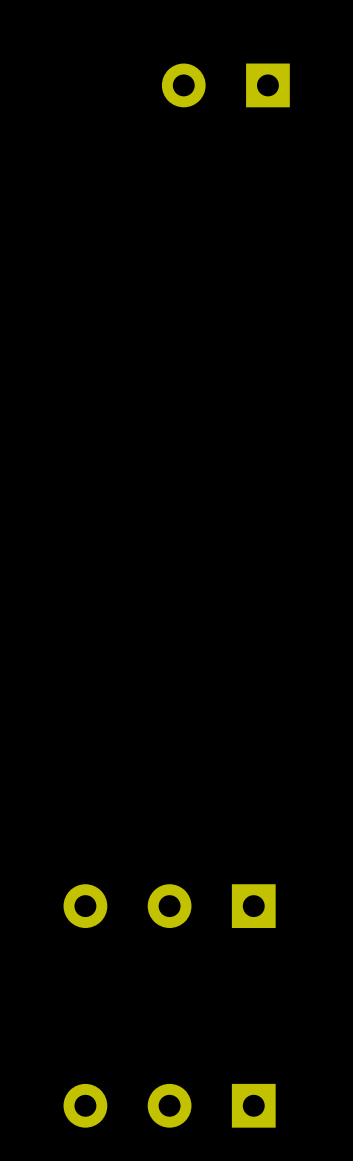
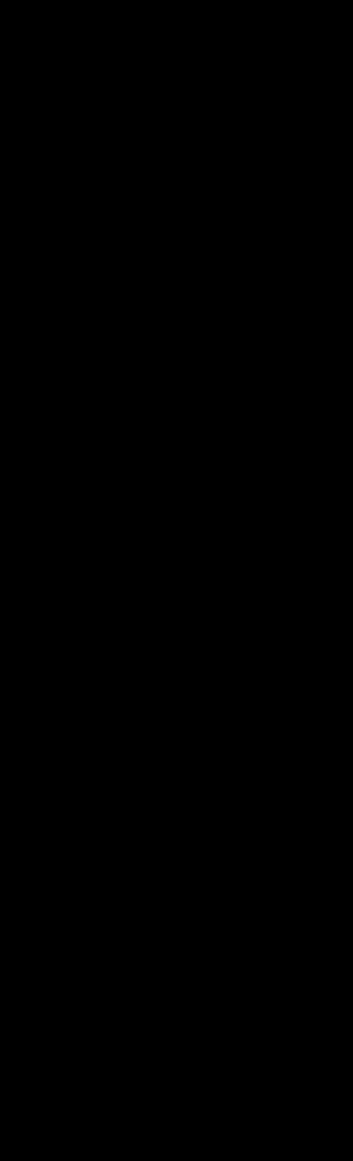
part: (225, 85) -> none
part: (169, 906) -> none
part: (169, 1105) -> none

